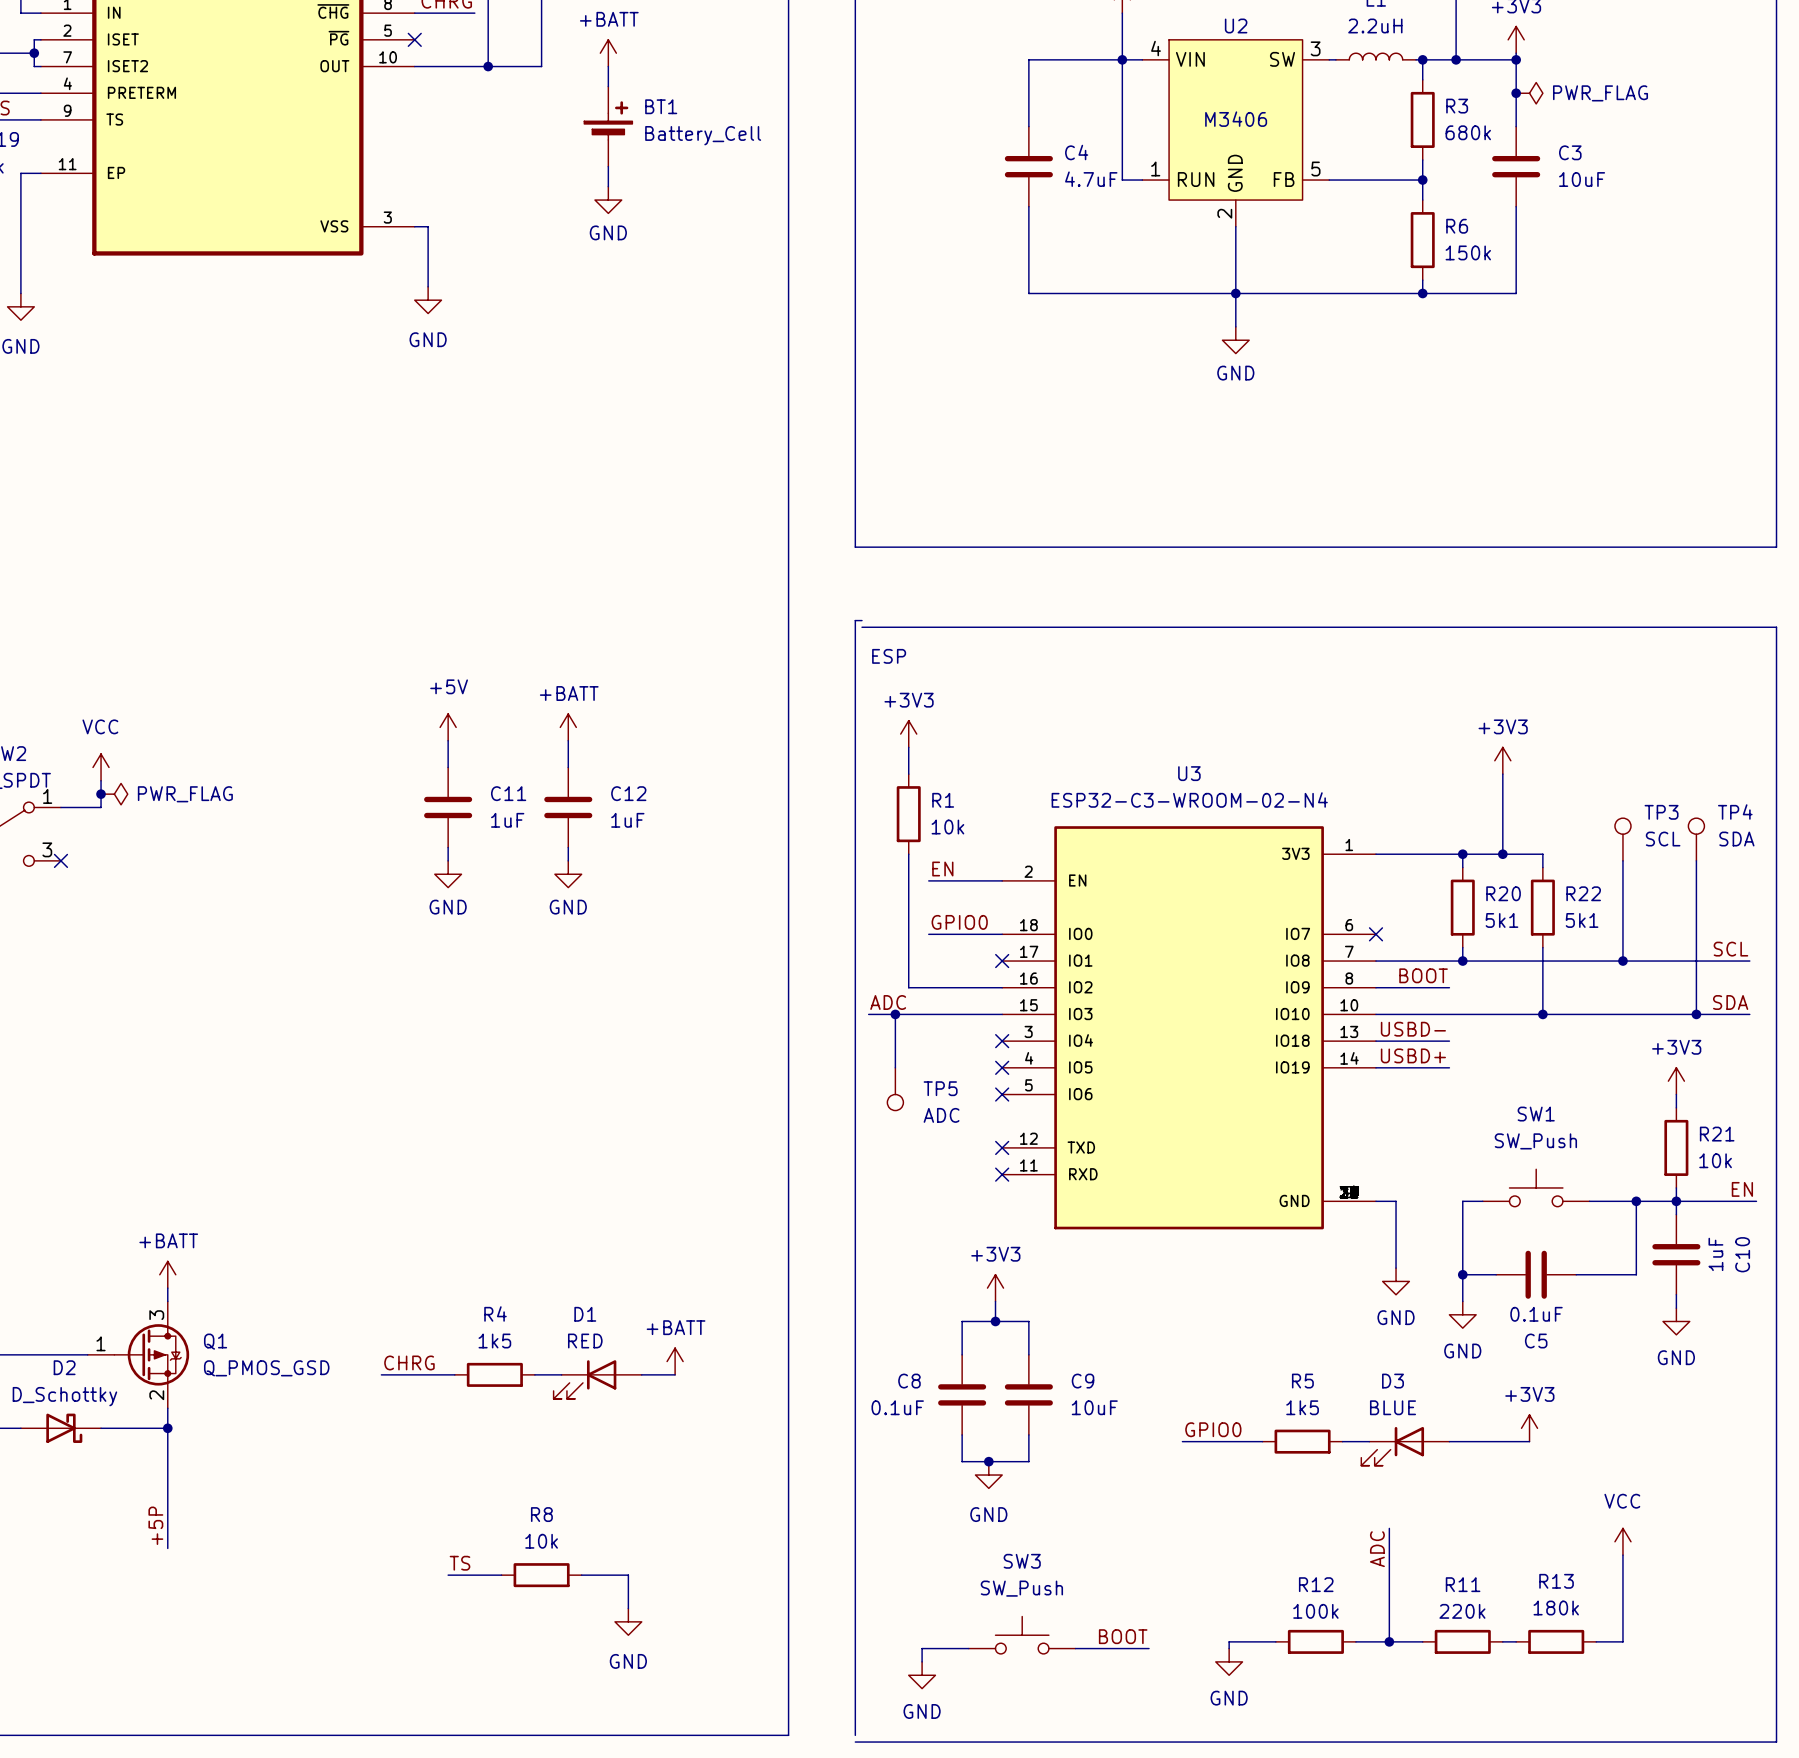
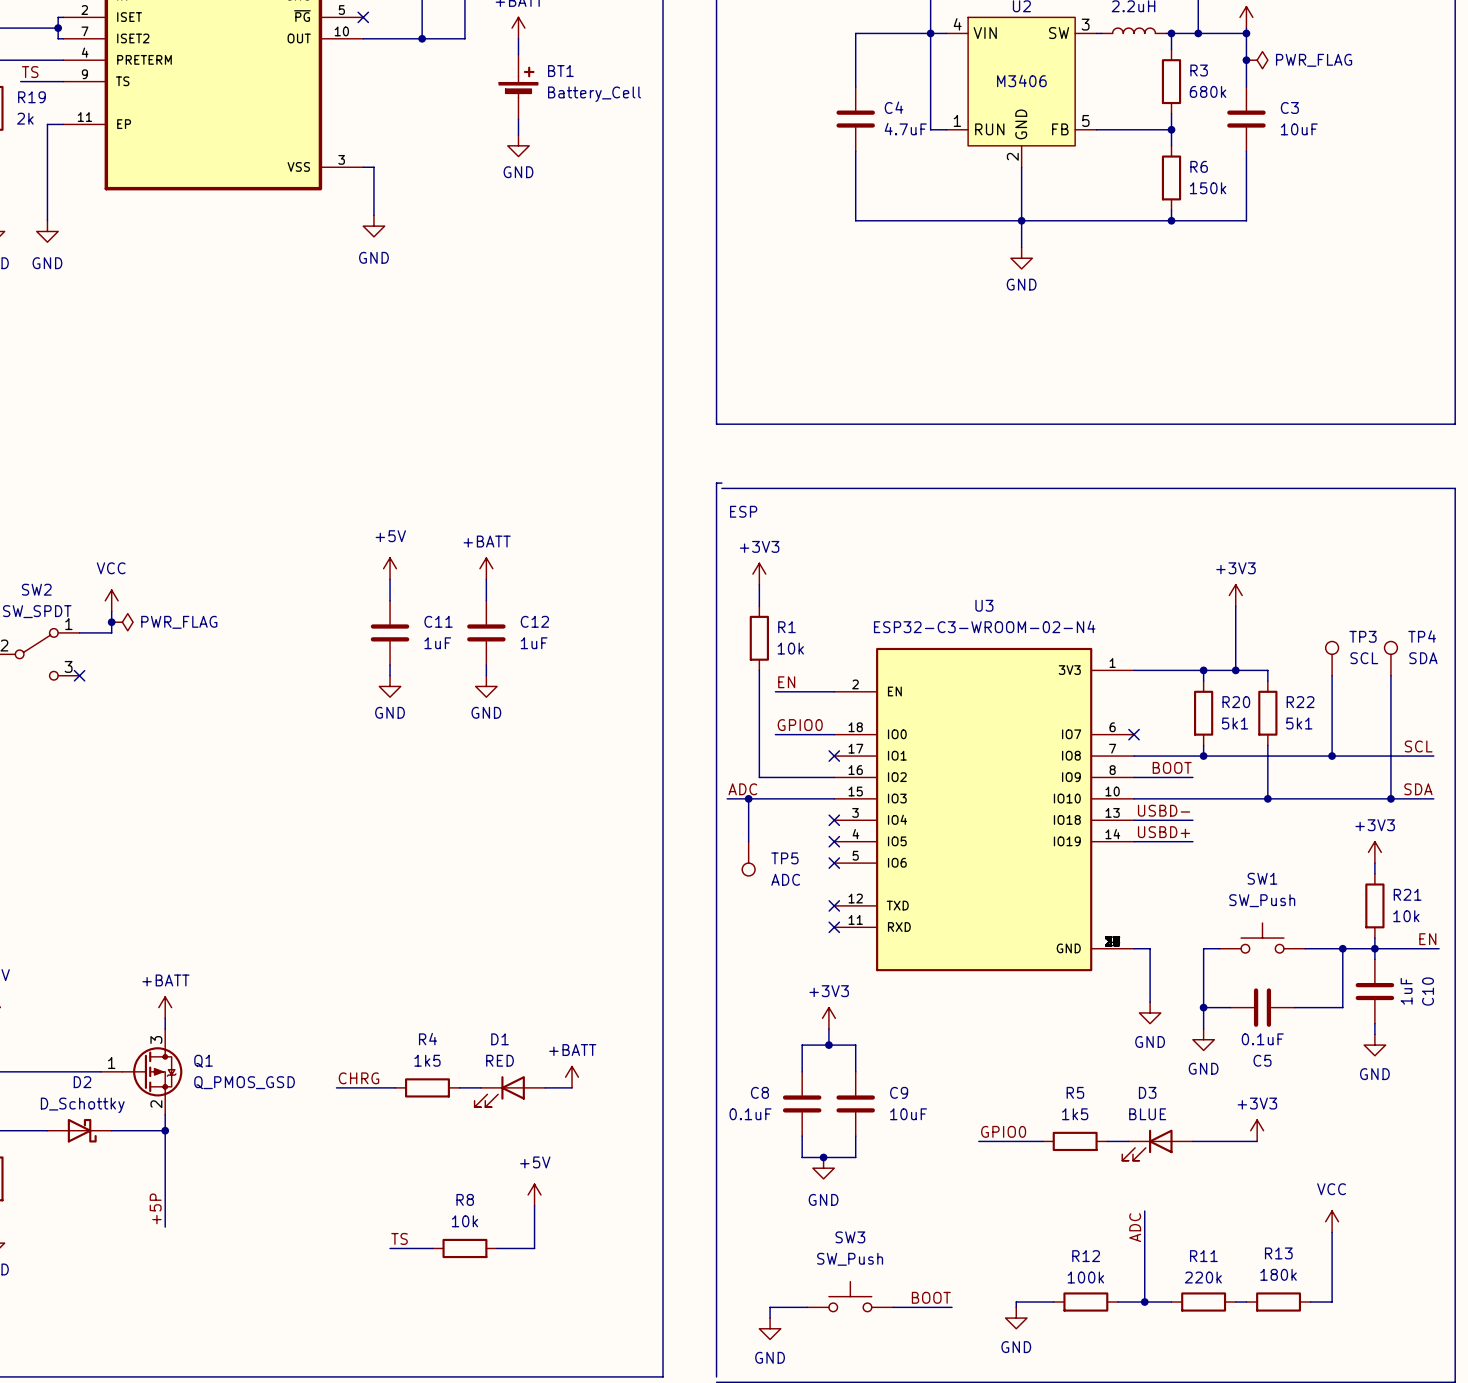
power symbol: none -> +5V (534, 1194)
wire: (628, 1575) (628, 1608) -> (534, 1248) (534, 1205)
power symbol: GND (628, 1621) -> none

